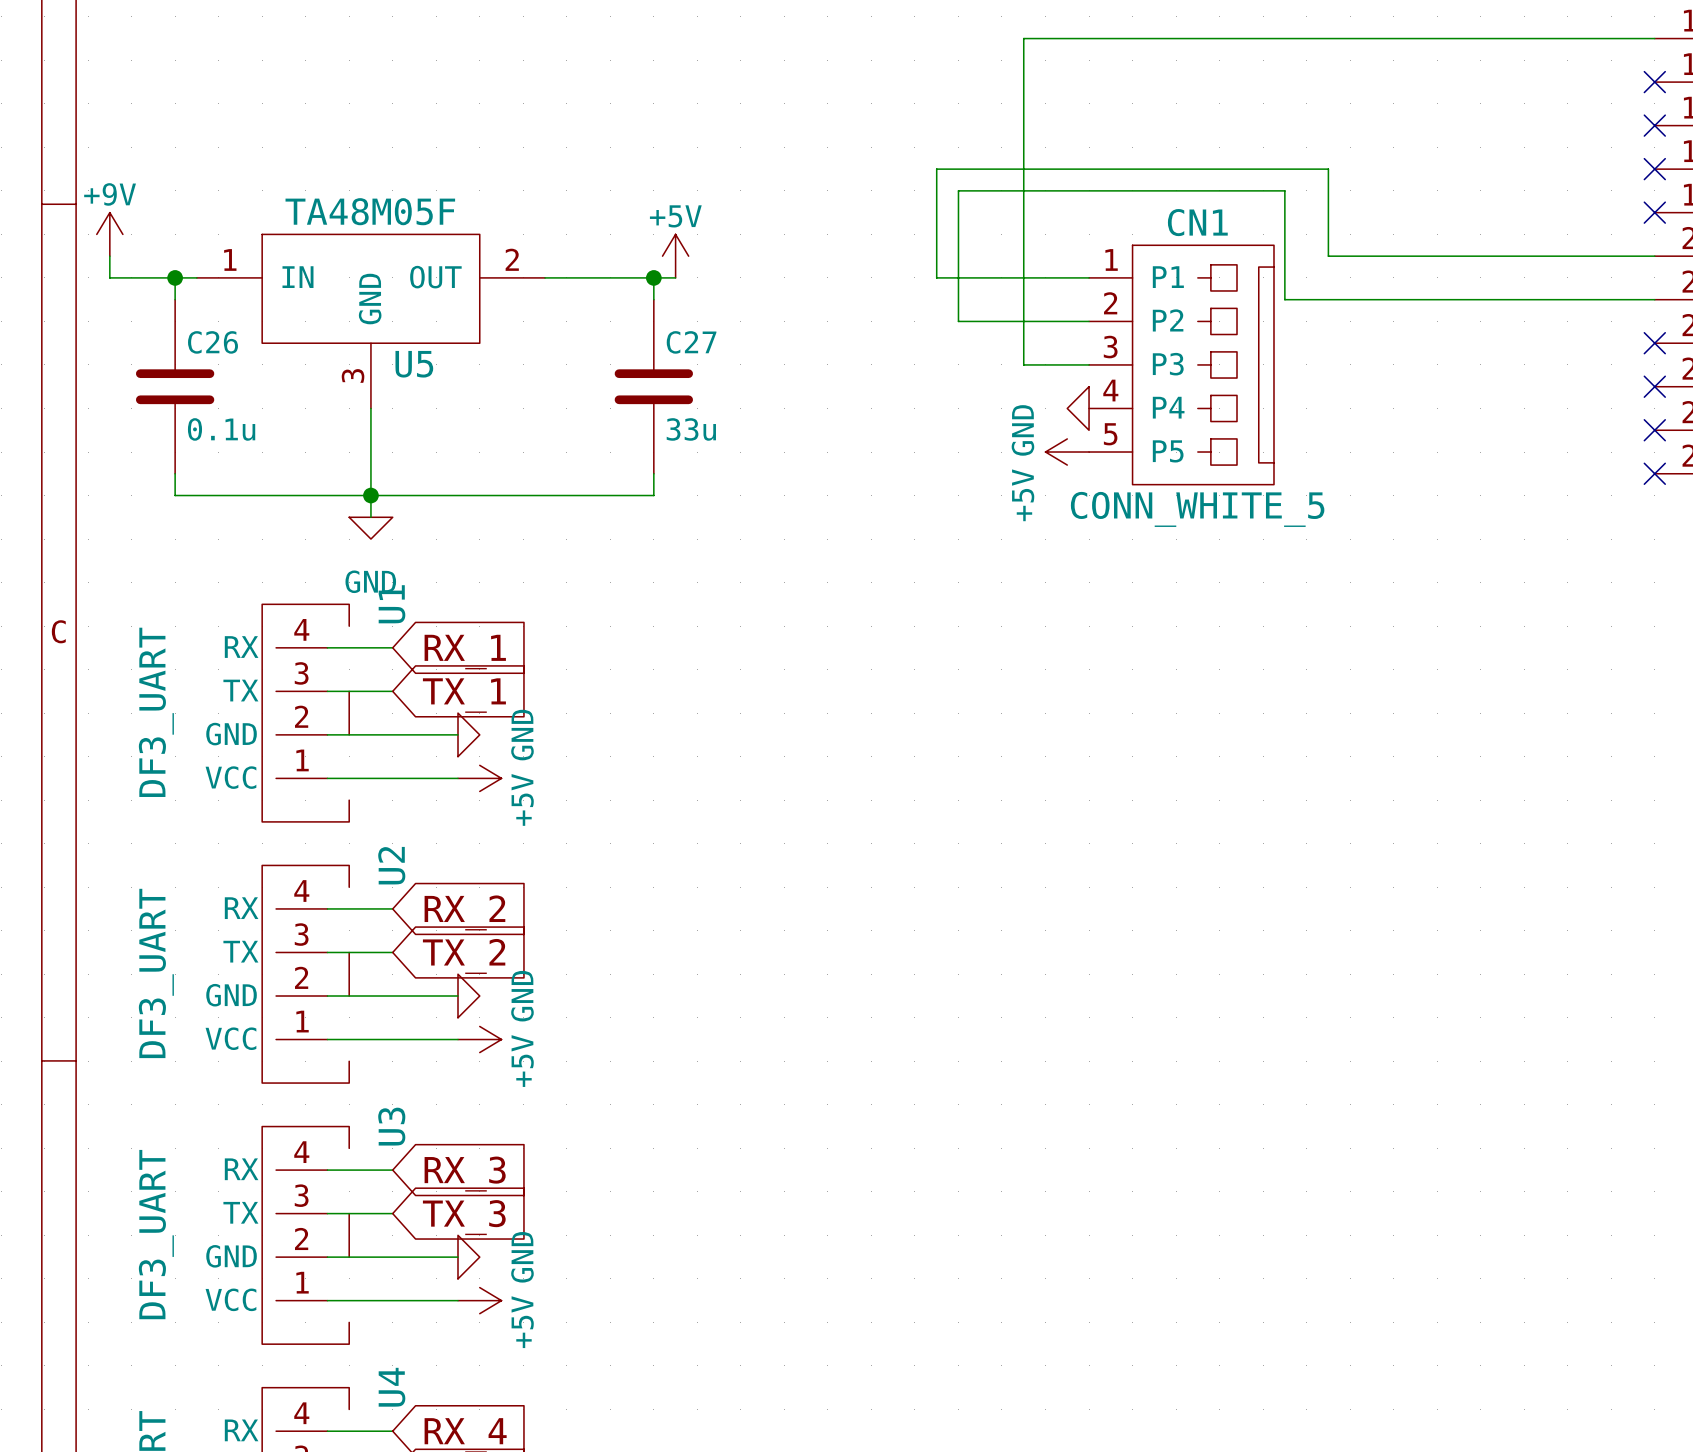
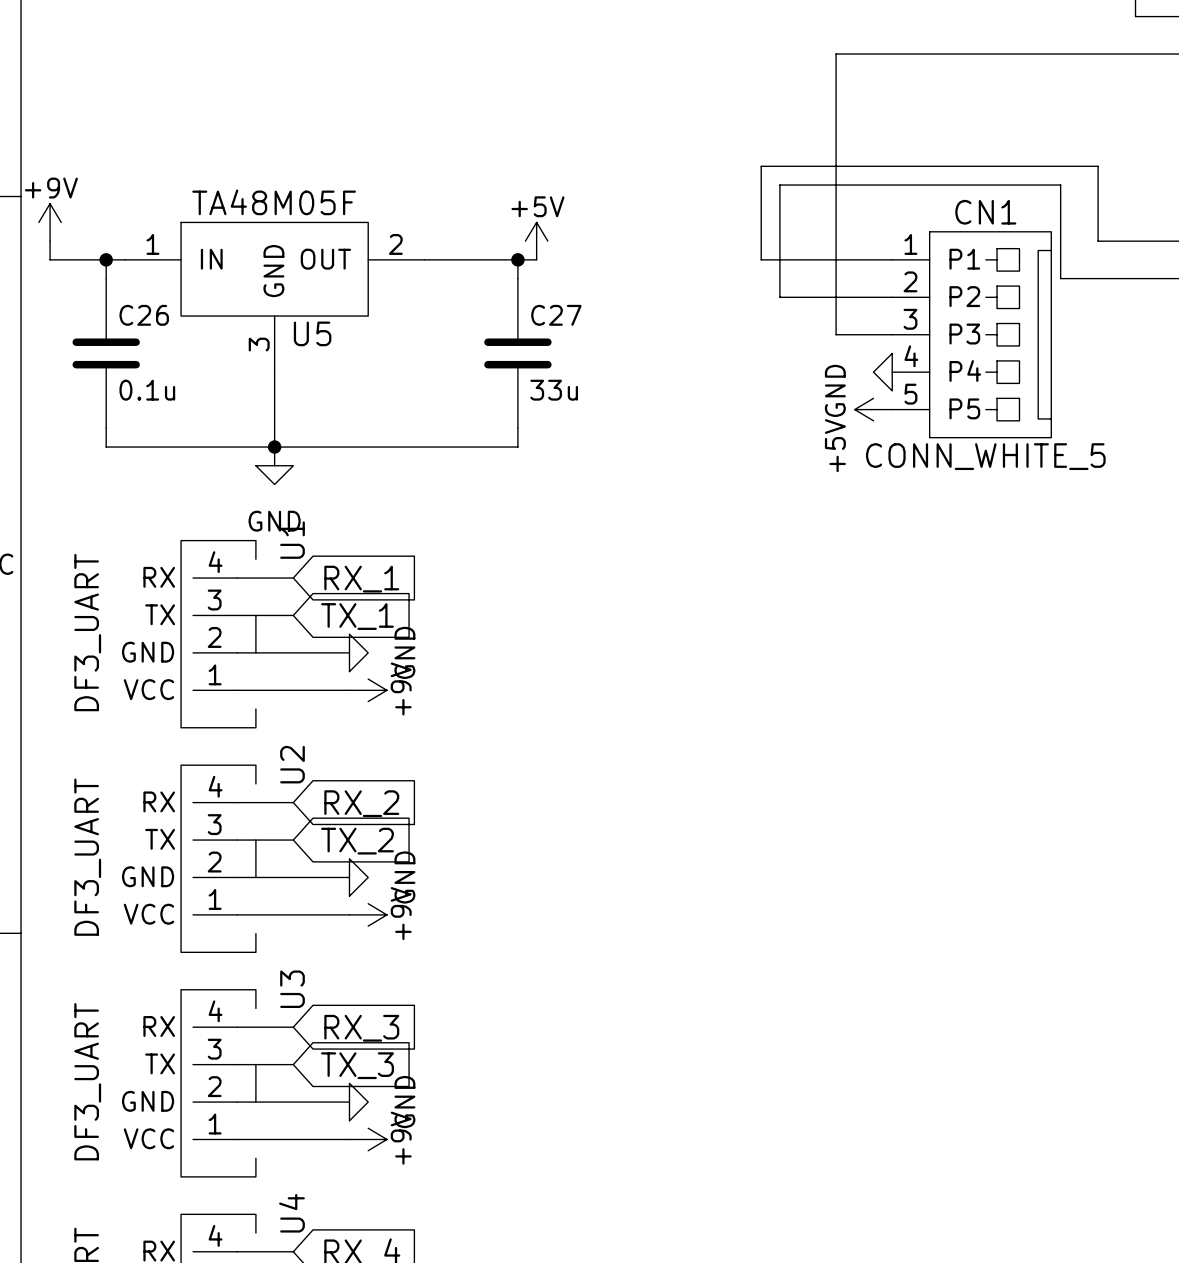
power symbol: +5V (479, 778) -> +9V (368, 690)
power symbol: +5V (479, 1039) -> +9V (368, 914)
power symbol: +5V (479, 1300) -> +9V (368, 1139)

